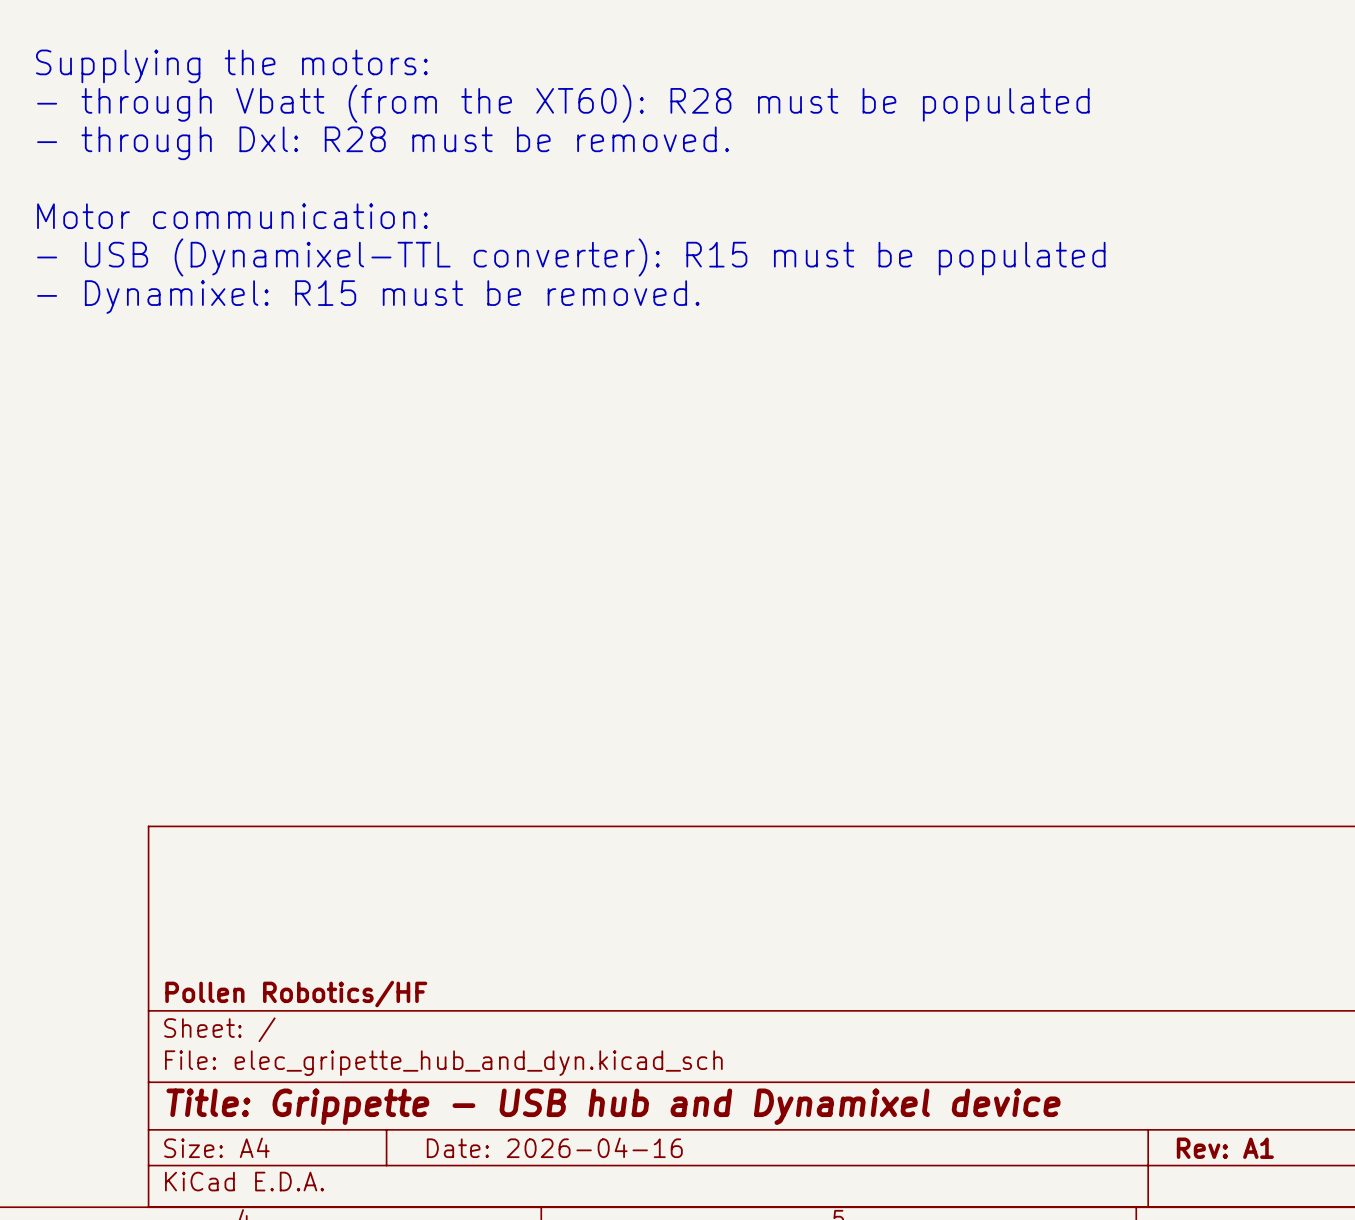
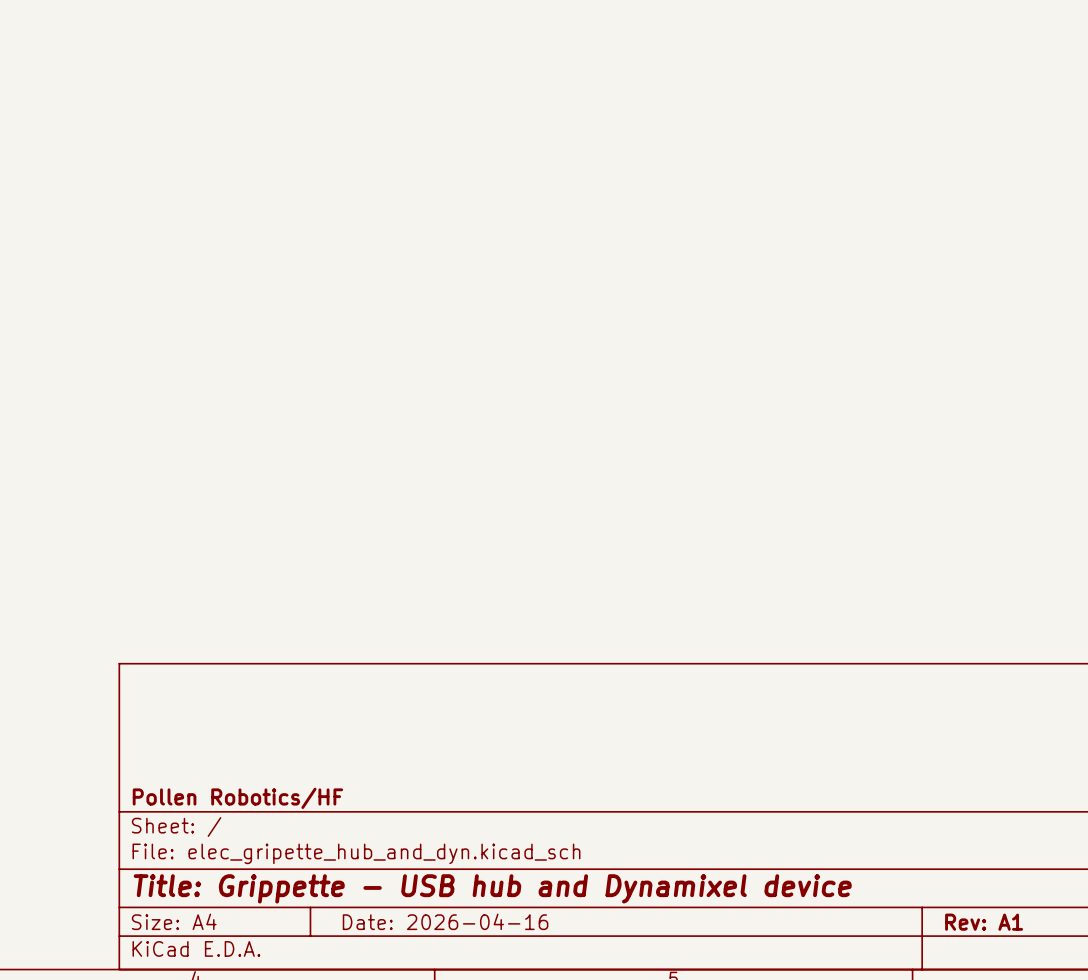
text: Supplying the motors: (231, 66) -> none
text: - through Vbatt (from the XT60): R28 must be populated (563, 103) -> none
text: - through Dxl: R28 must be removed. (383, 143) -> none
text: Motor communication: (232, 216) -> none
text: - USB (Dynamixel-TTL converter): R15 must be populated (571, 257) -> none
text: - Dynamixel: R15 must be removed. (368, 297) -> none

